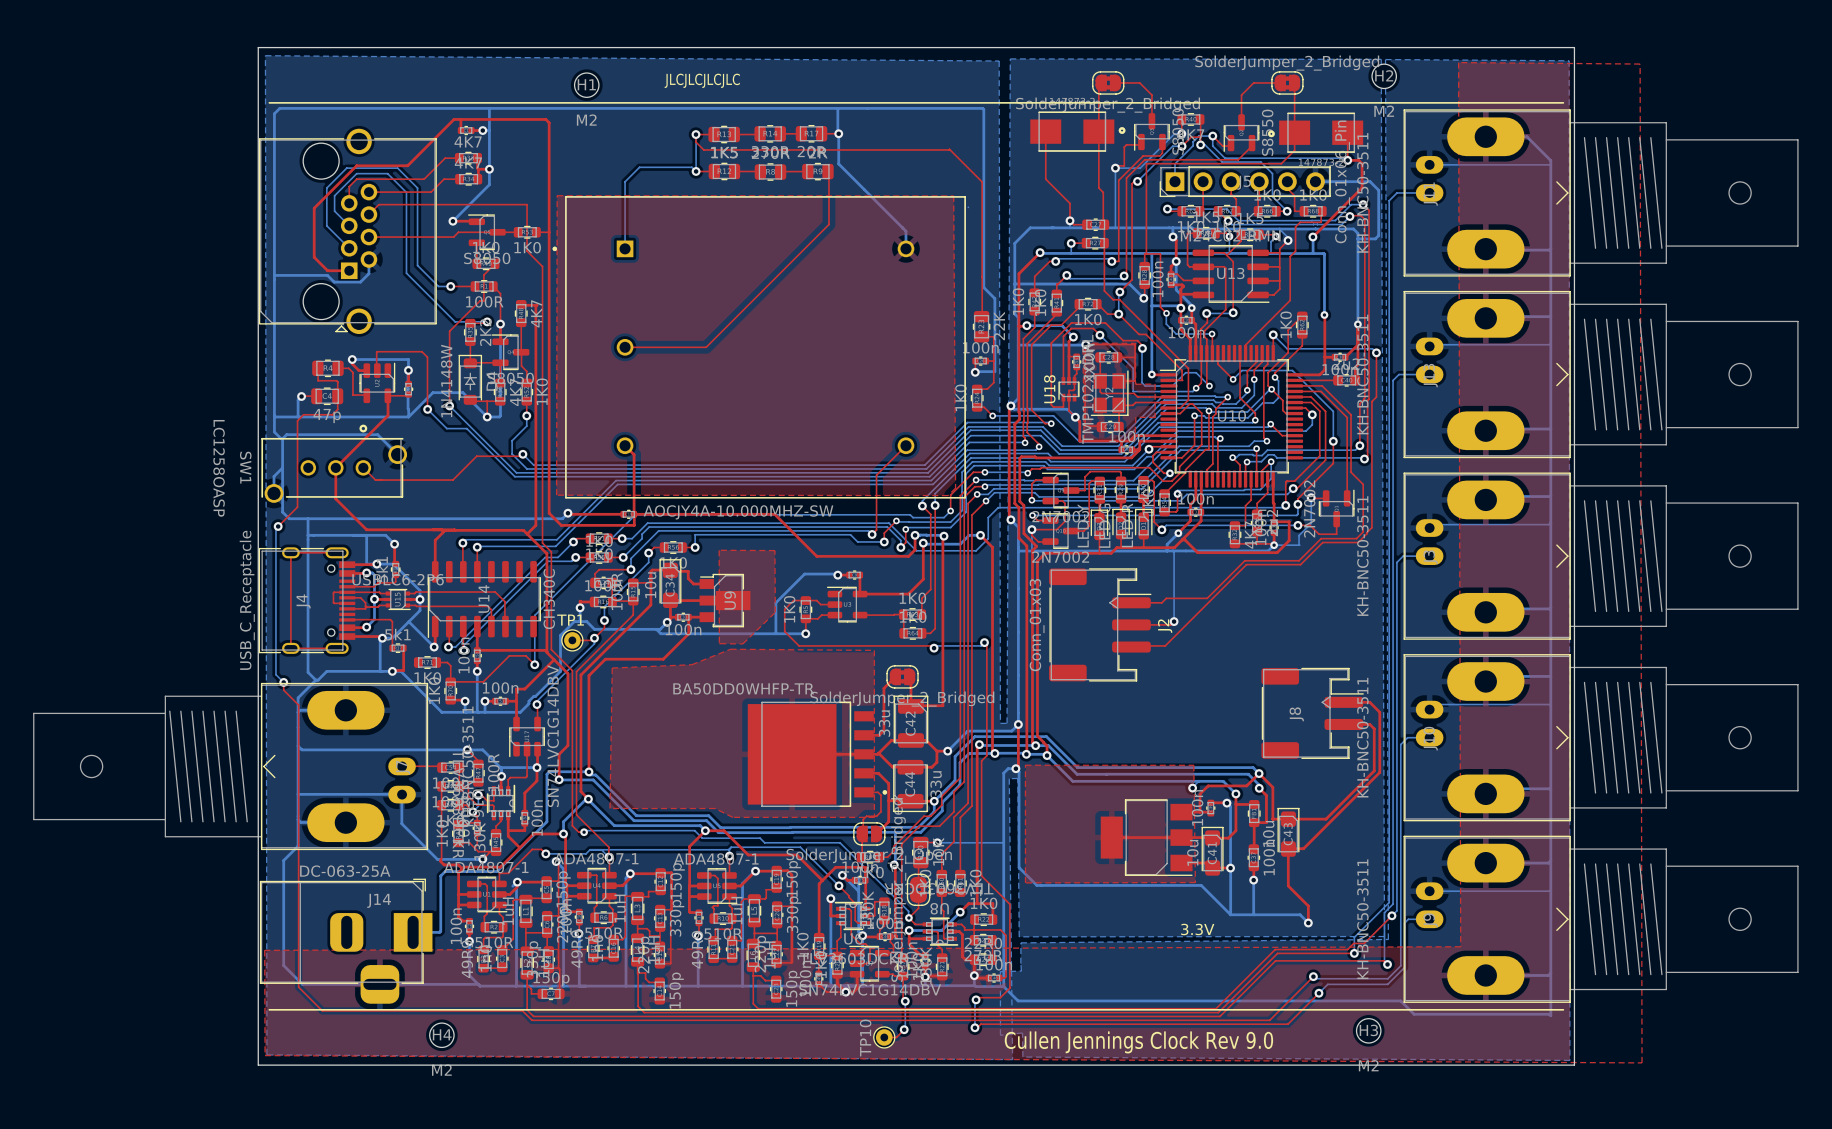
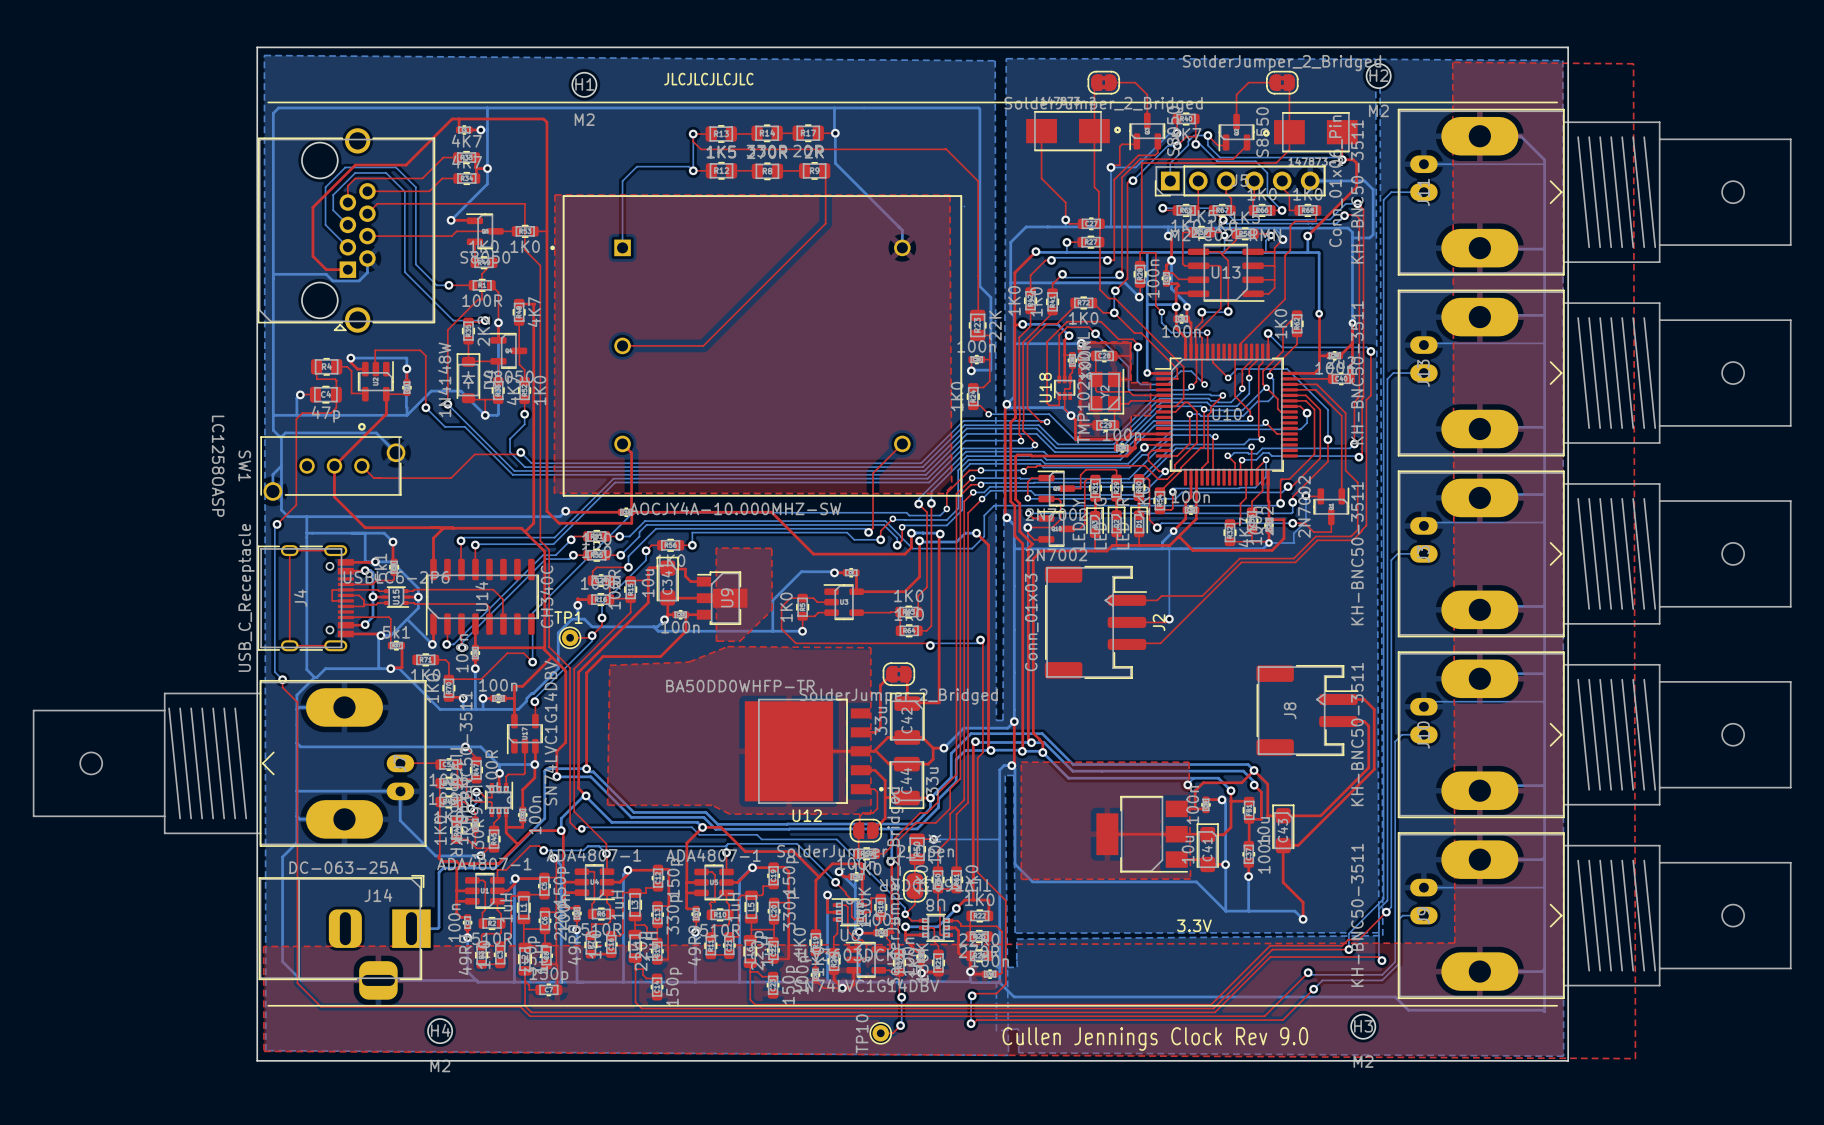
U12 name: none -> U12 (807, 815)

